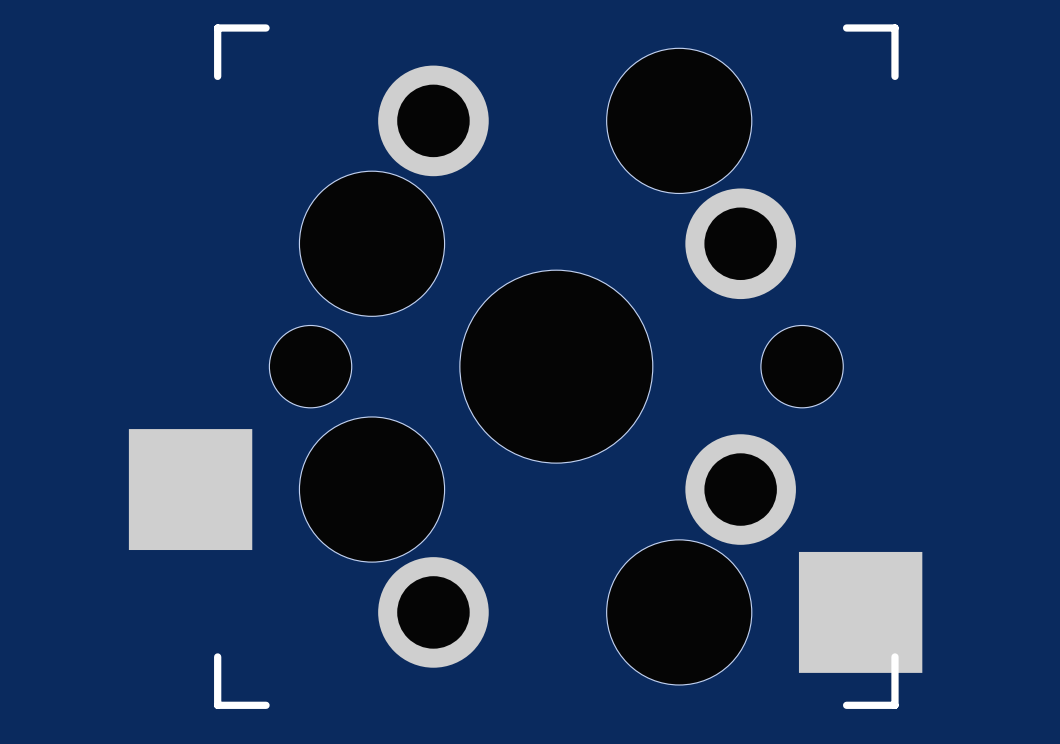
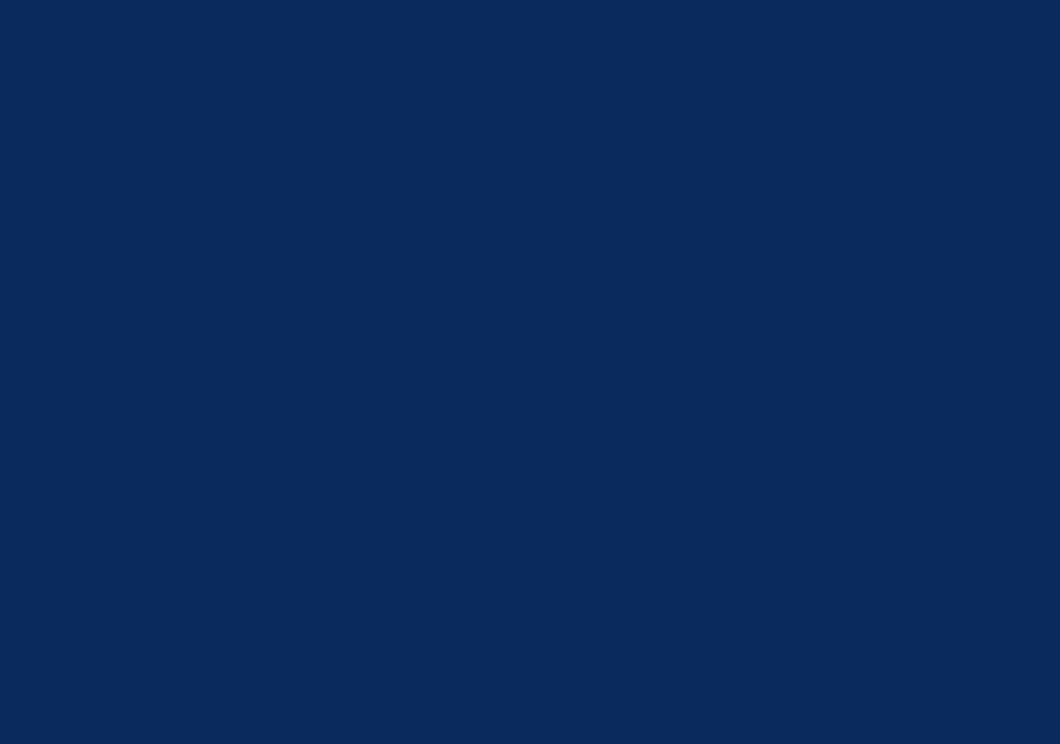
part: (525, 366) -> none

